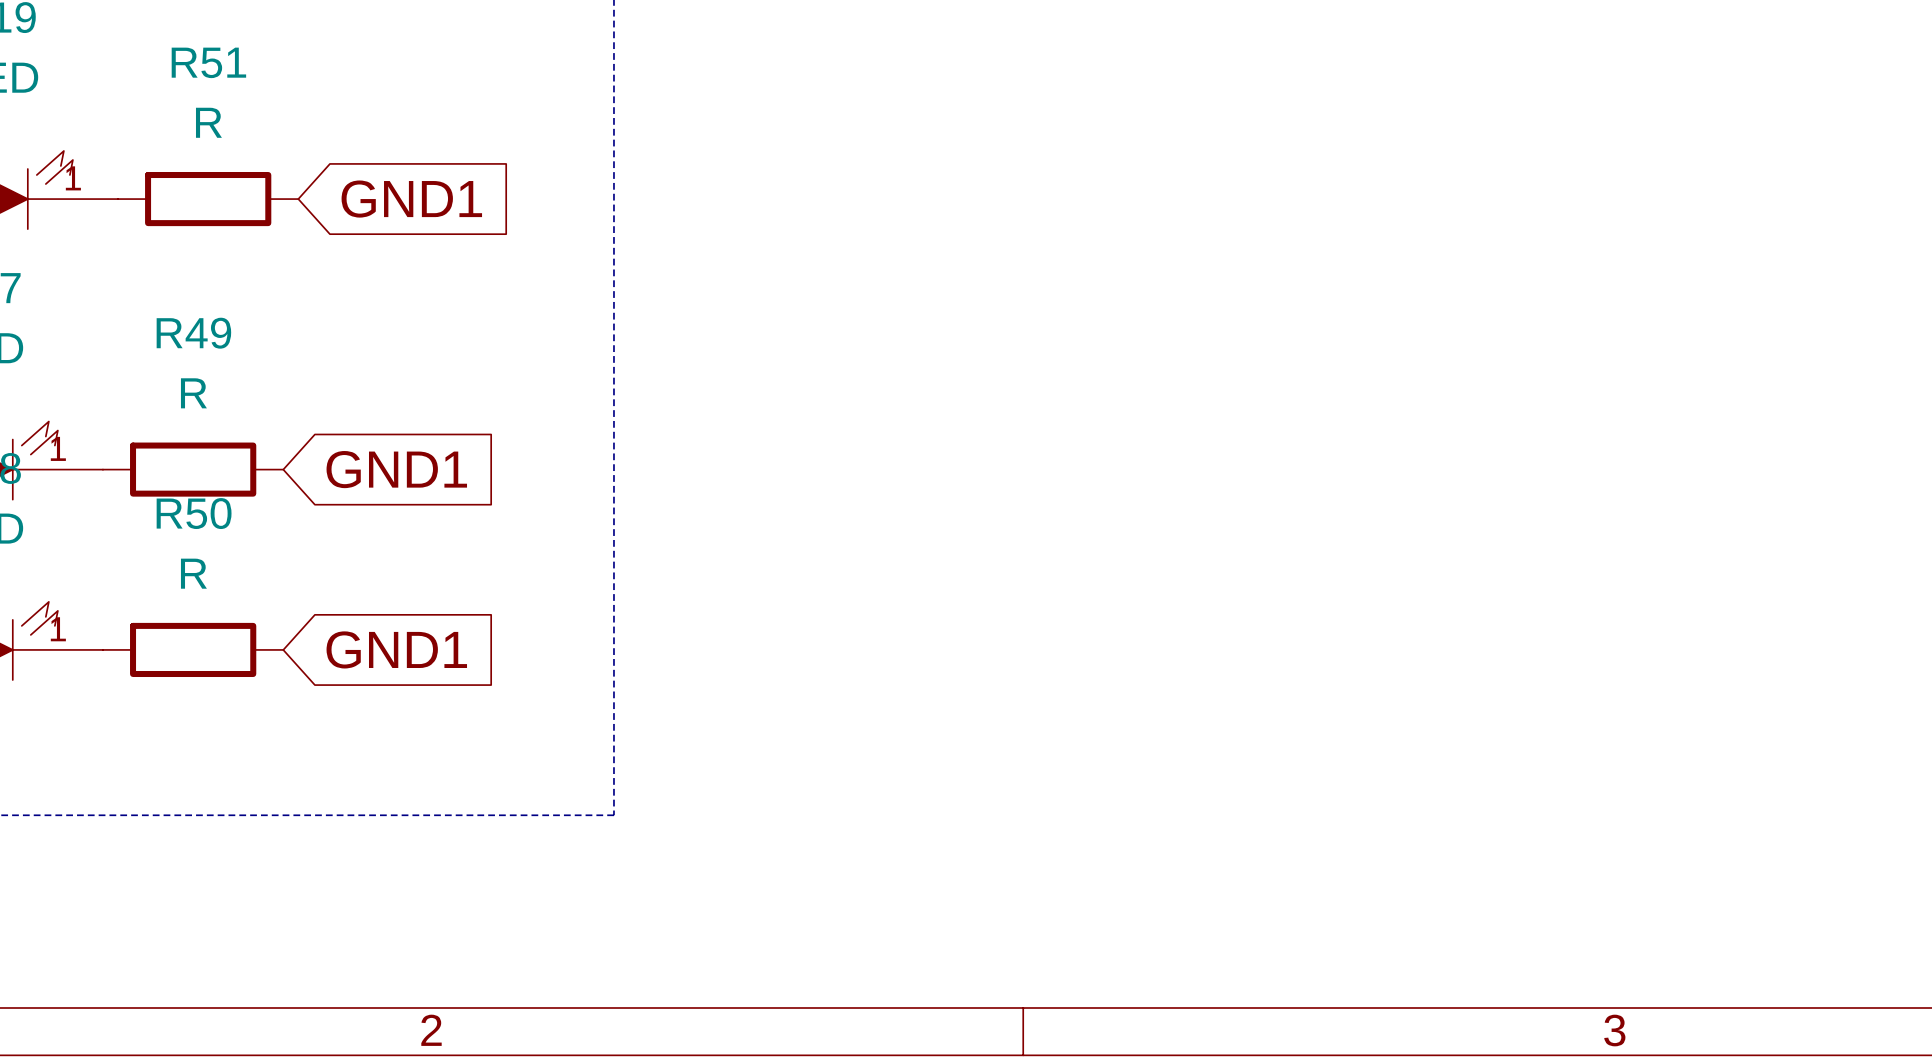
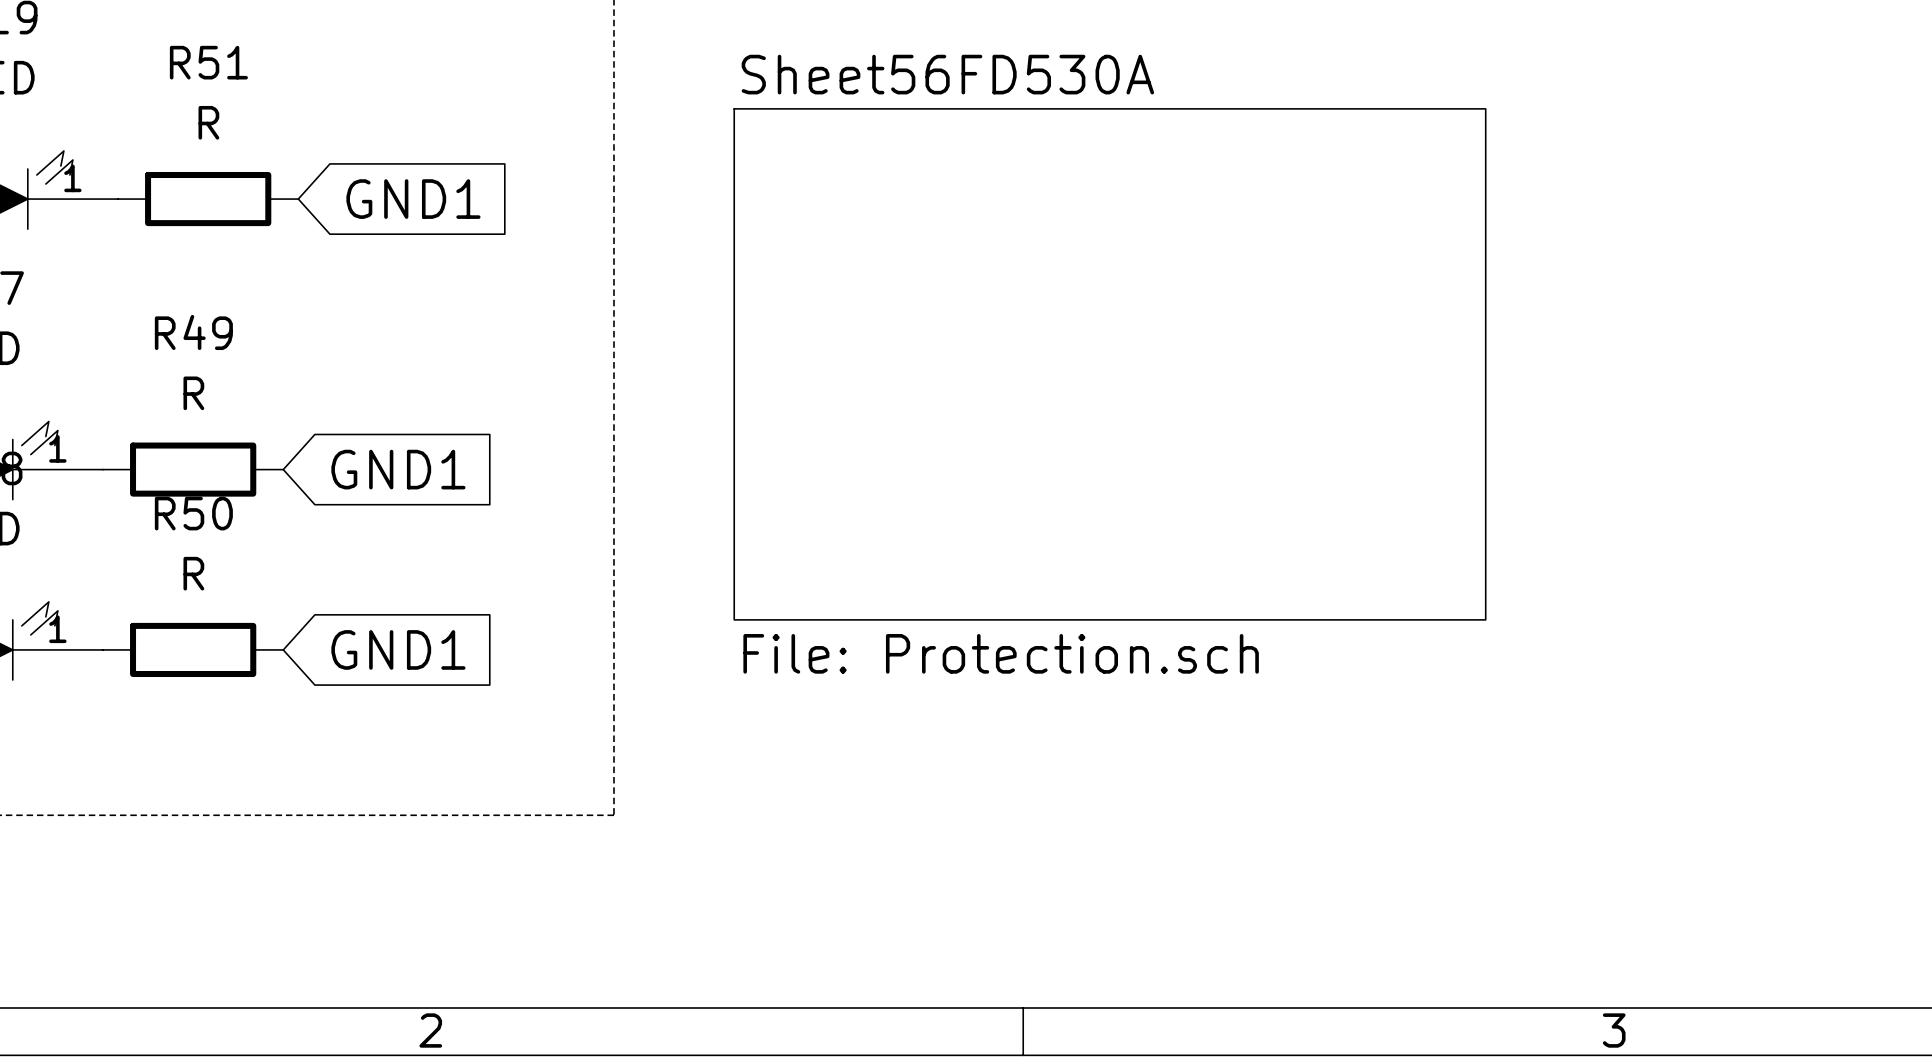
sheet Sheet56FD530A: none -> File: Protection.sch (1109, 364)

